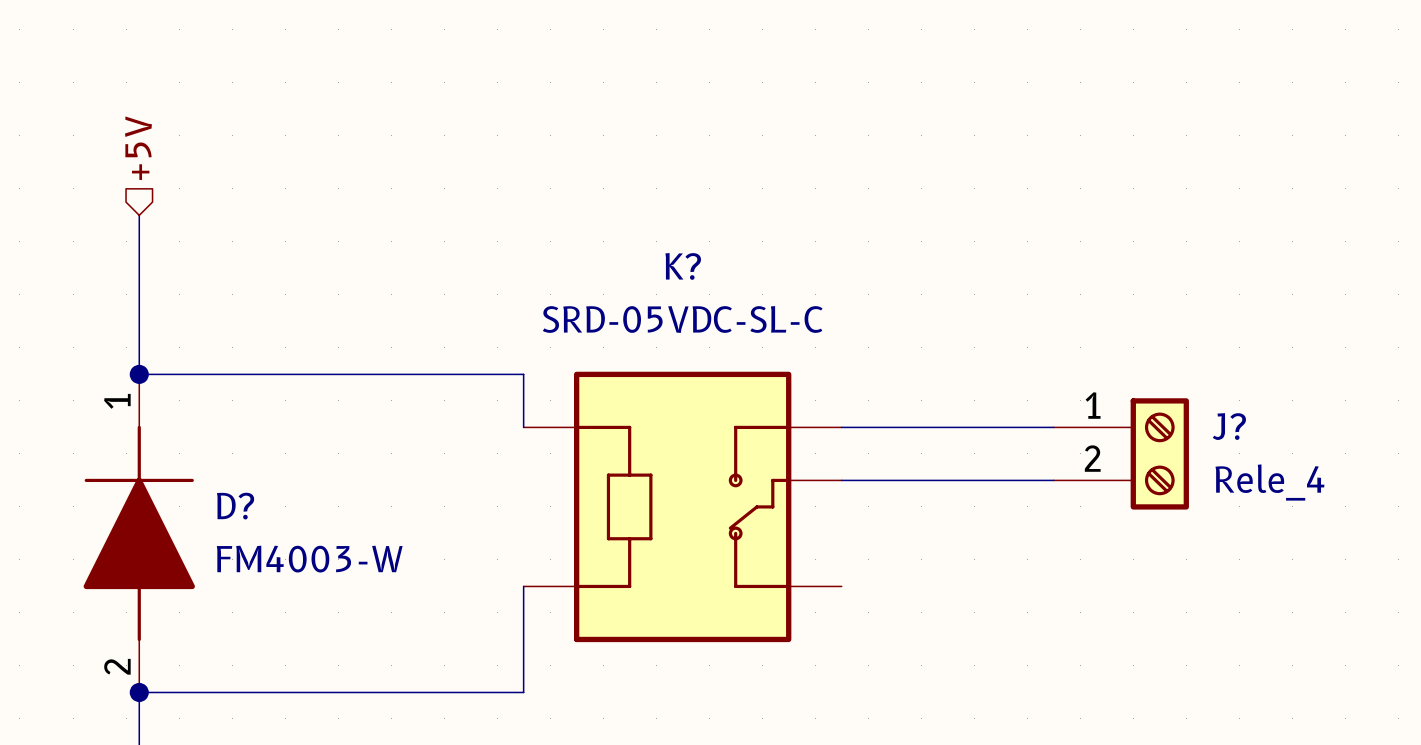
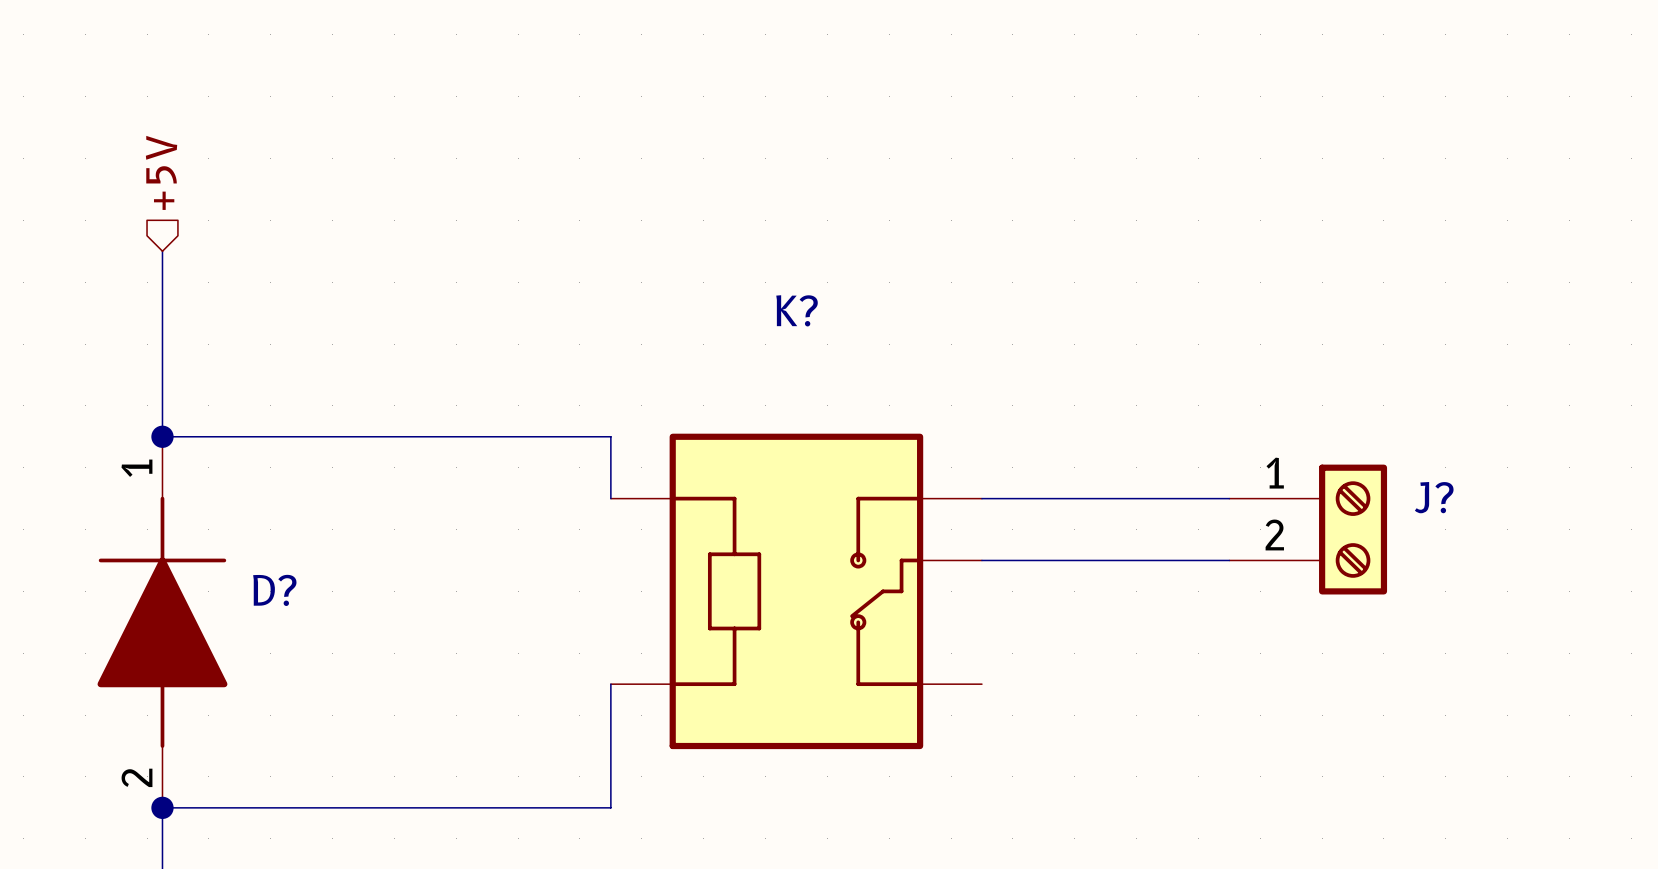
K? value: SRD-05VDC-SL-C (682, 319) -> none
J? value: Rele_4 (1269, 482) -> none
D? value: FM4003-W (309, 559) -> none

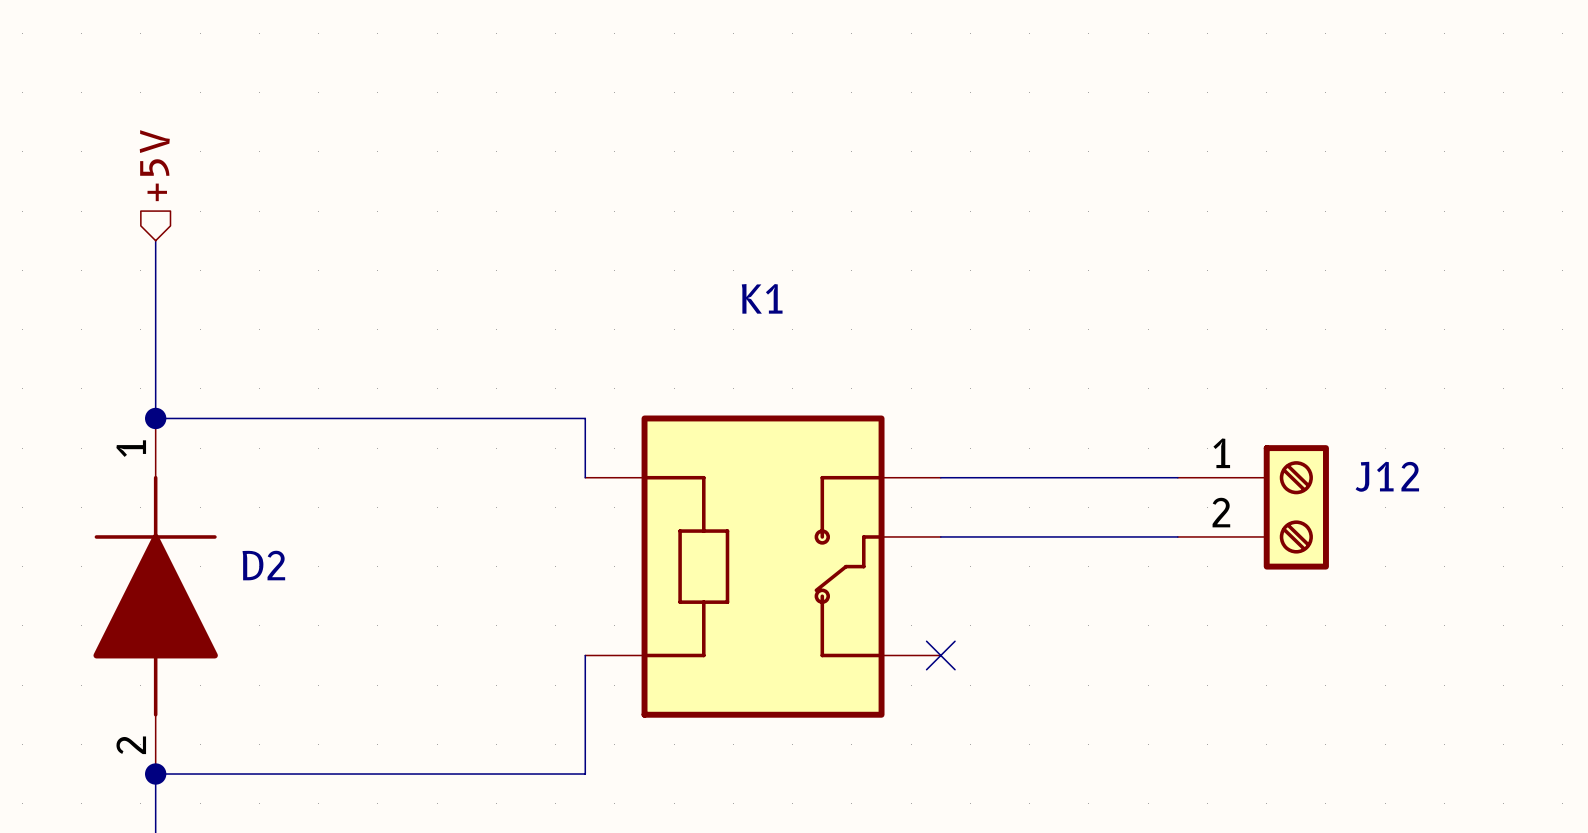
K? name: K? (797, 310) -> K1 (762, 298)
J? name: J? (1434, 497) -> J12 (1387, 476)
D? name: D? (274, 590) -> D2 (263, 565)
no-connect mark: none -> (940, 655)

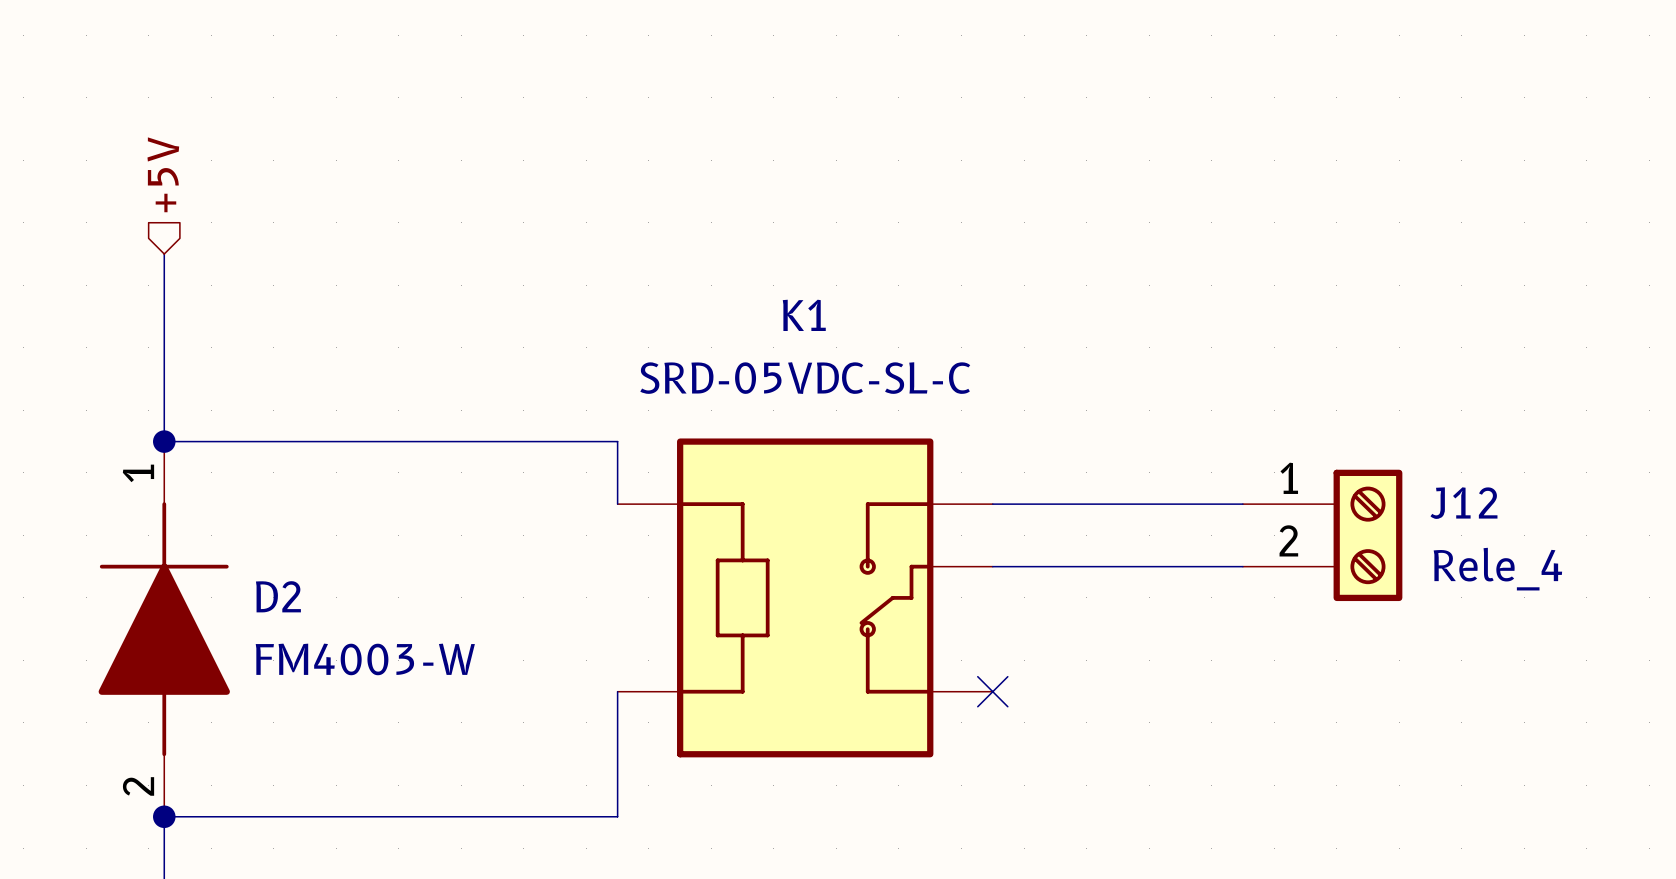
K1 value: none -> SRD-05VDC-SL-C (805, 378)
J12 value: none -> Rele_4 (1497, 569)
D2 value: none -> FM4003-W (365, 659)

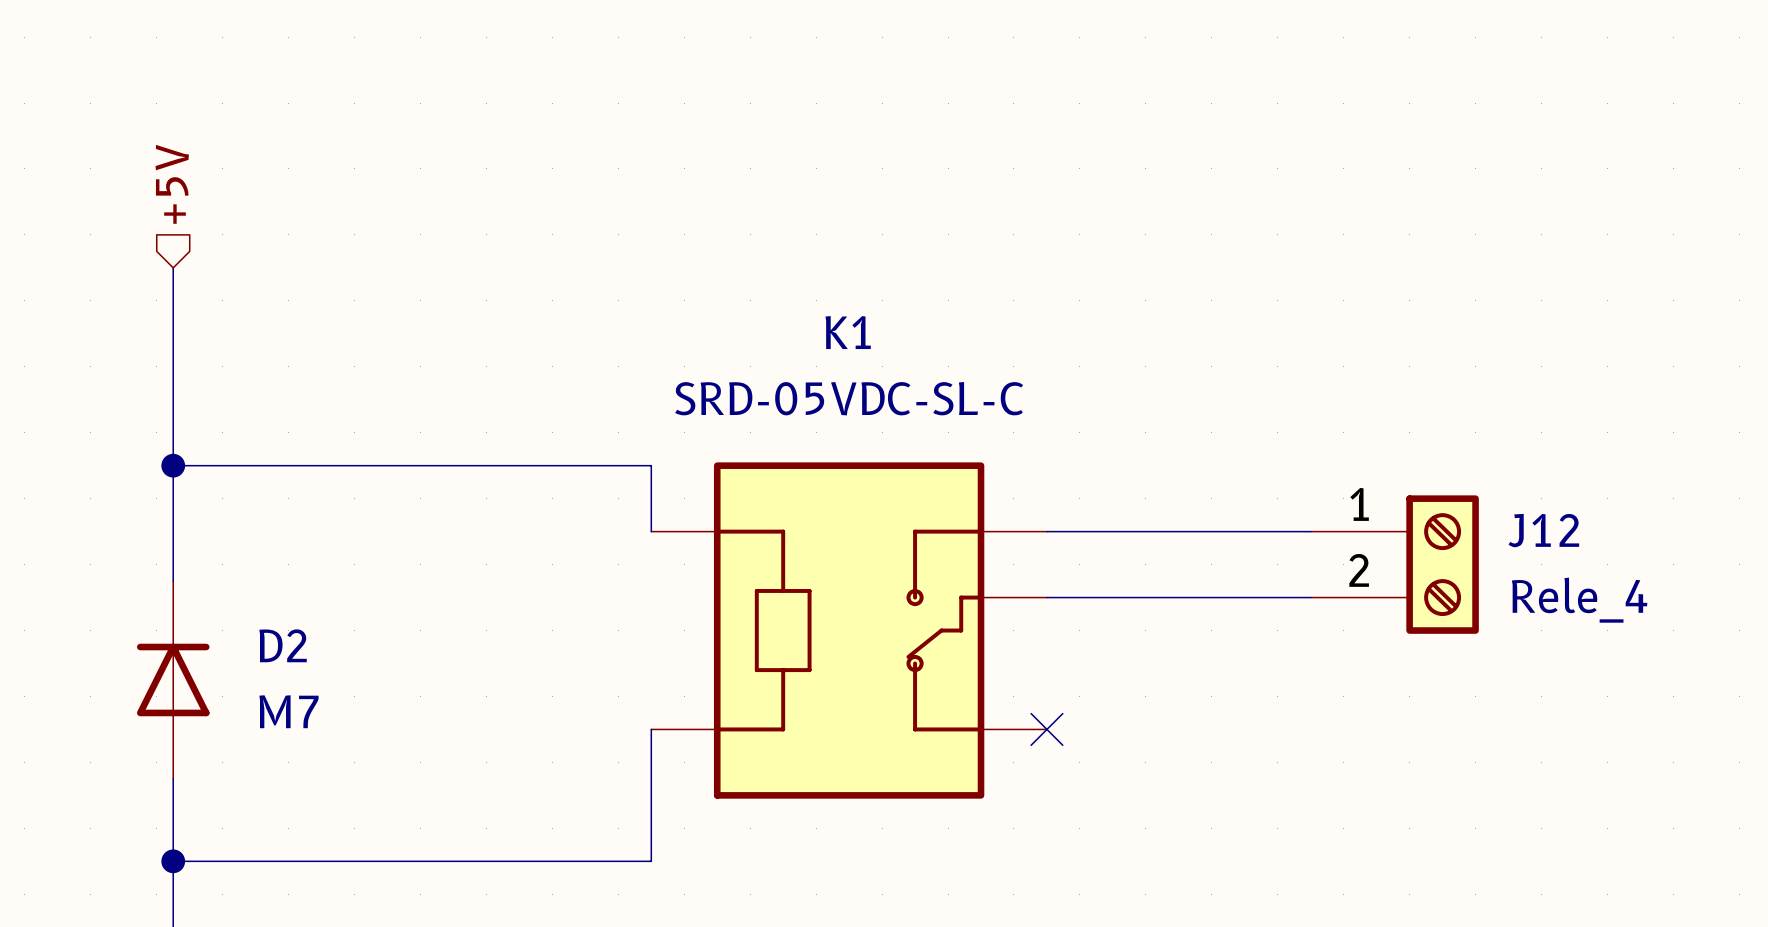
D2 symbol: [98, 441, 230, 817] -> [136, 581, 210, 779]
D2 value: FM4003-W (365, 659) -> M7 (288, 711)

